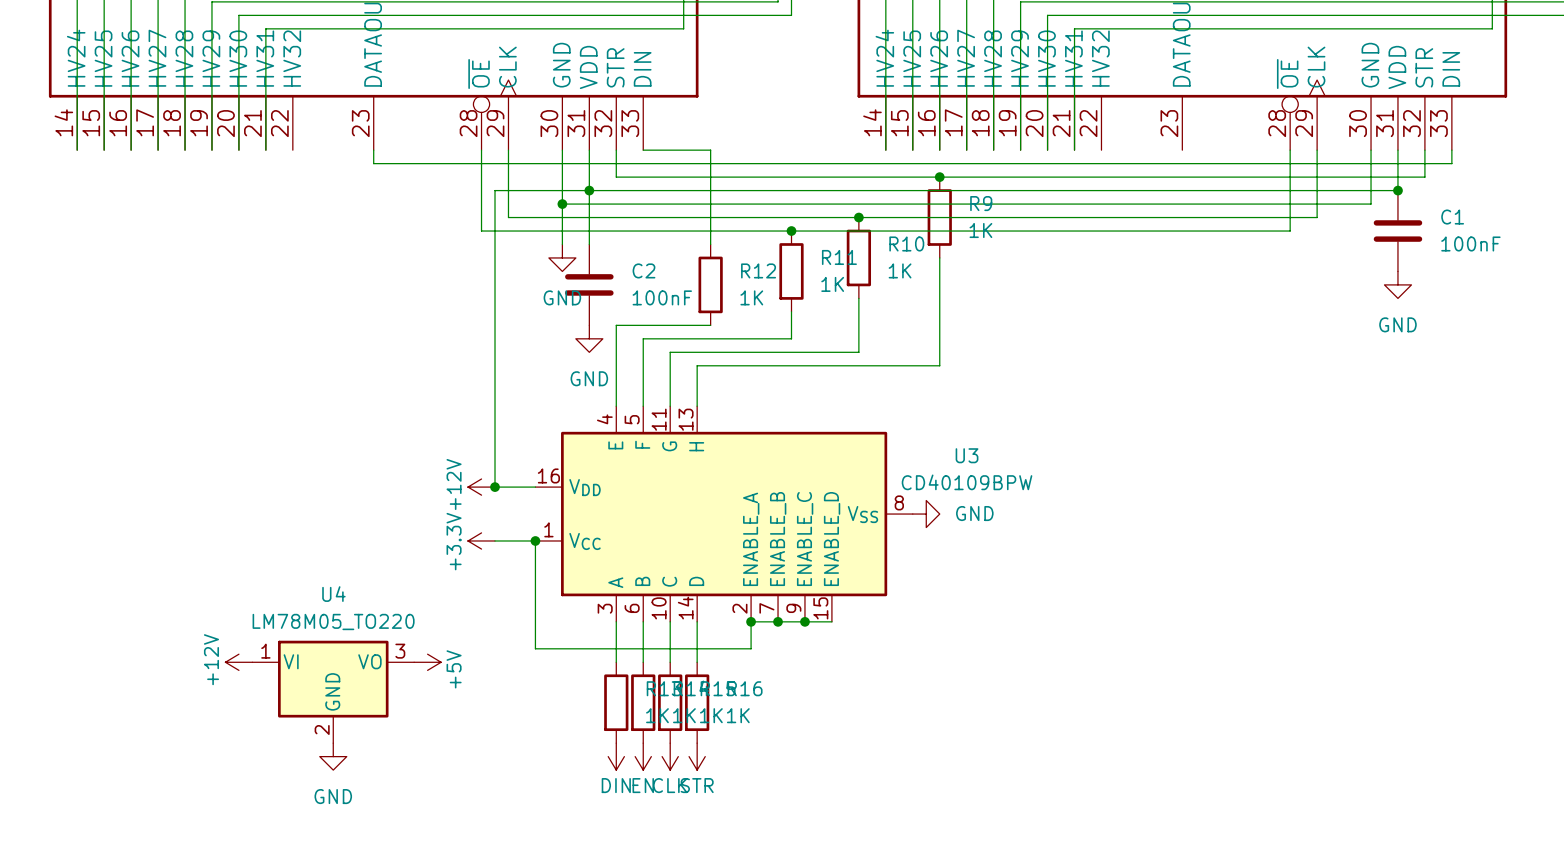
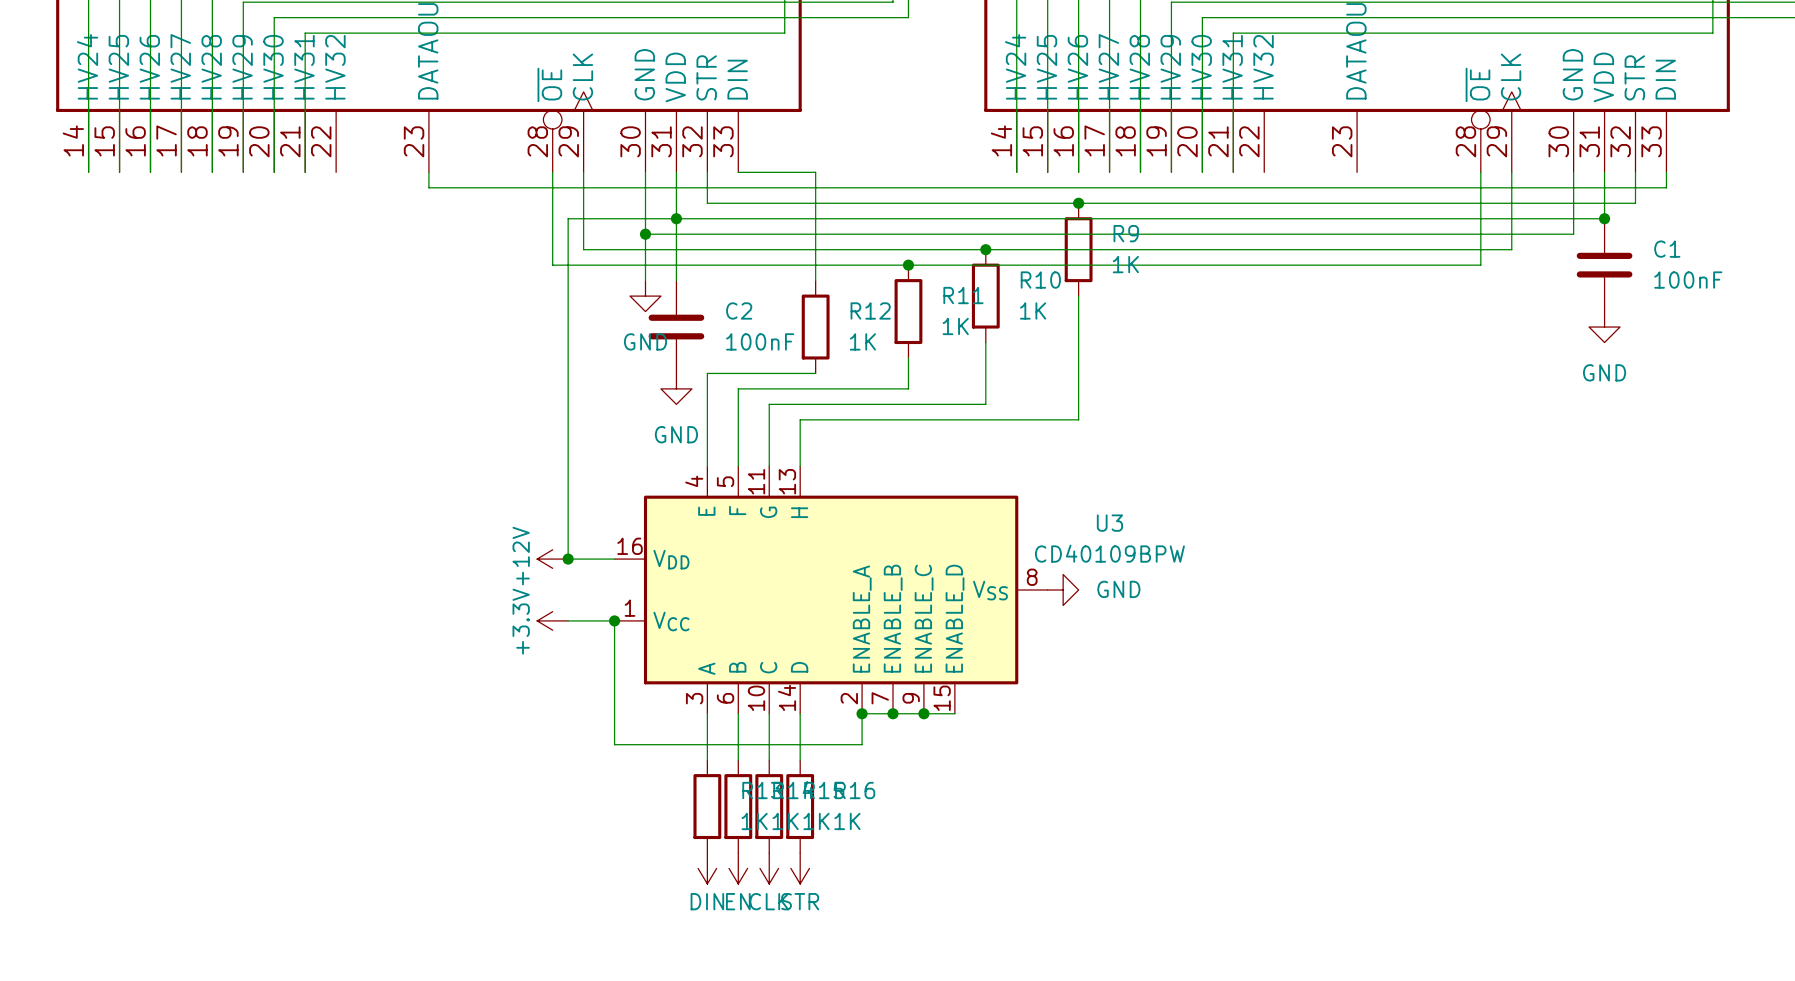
power symbol: +12V (238, 662) -> none
power symbol: +5V (427, 662) -> none
U4: LM78M05_TO220 (333, 691) -> none
power symbol: GND (333, 756) -> none

